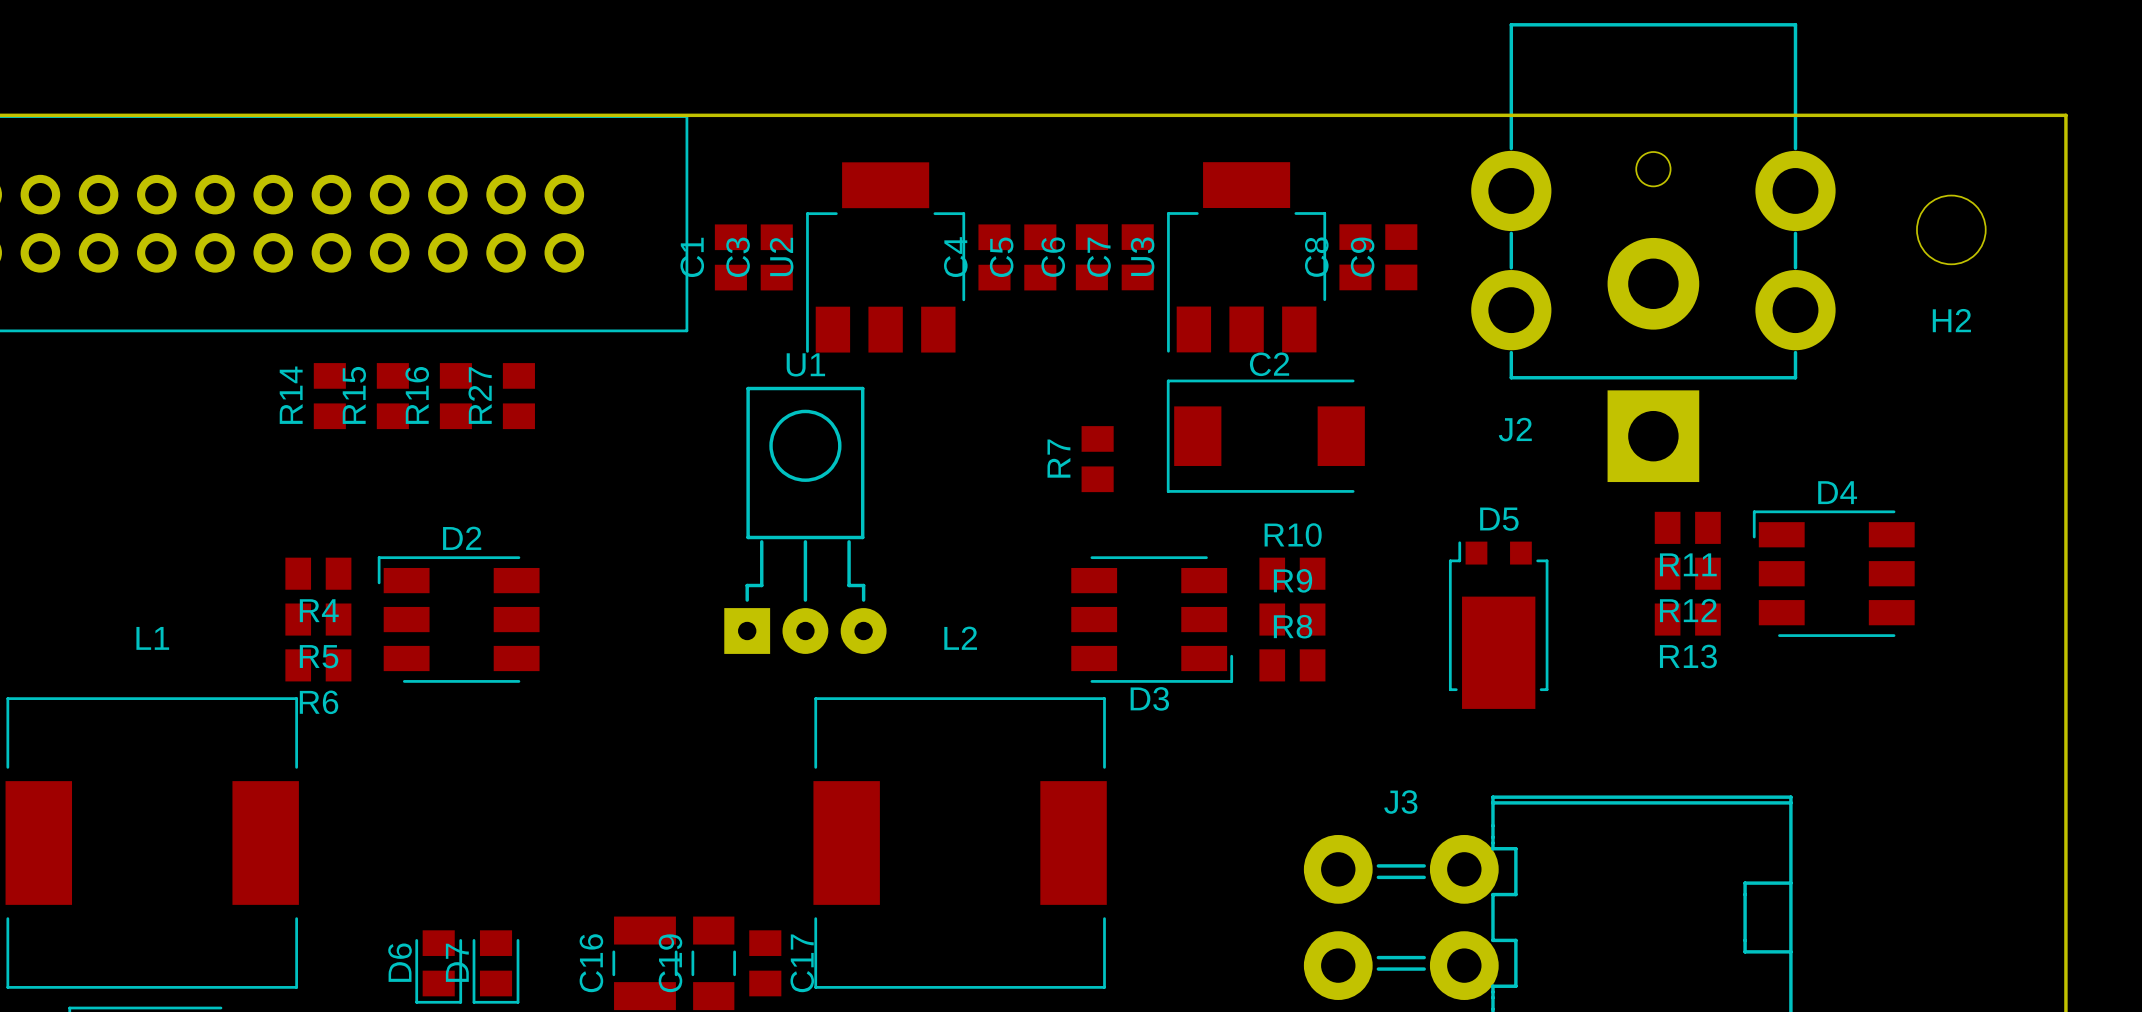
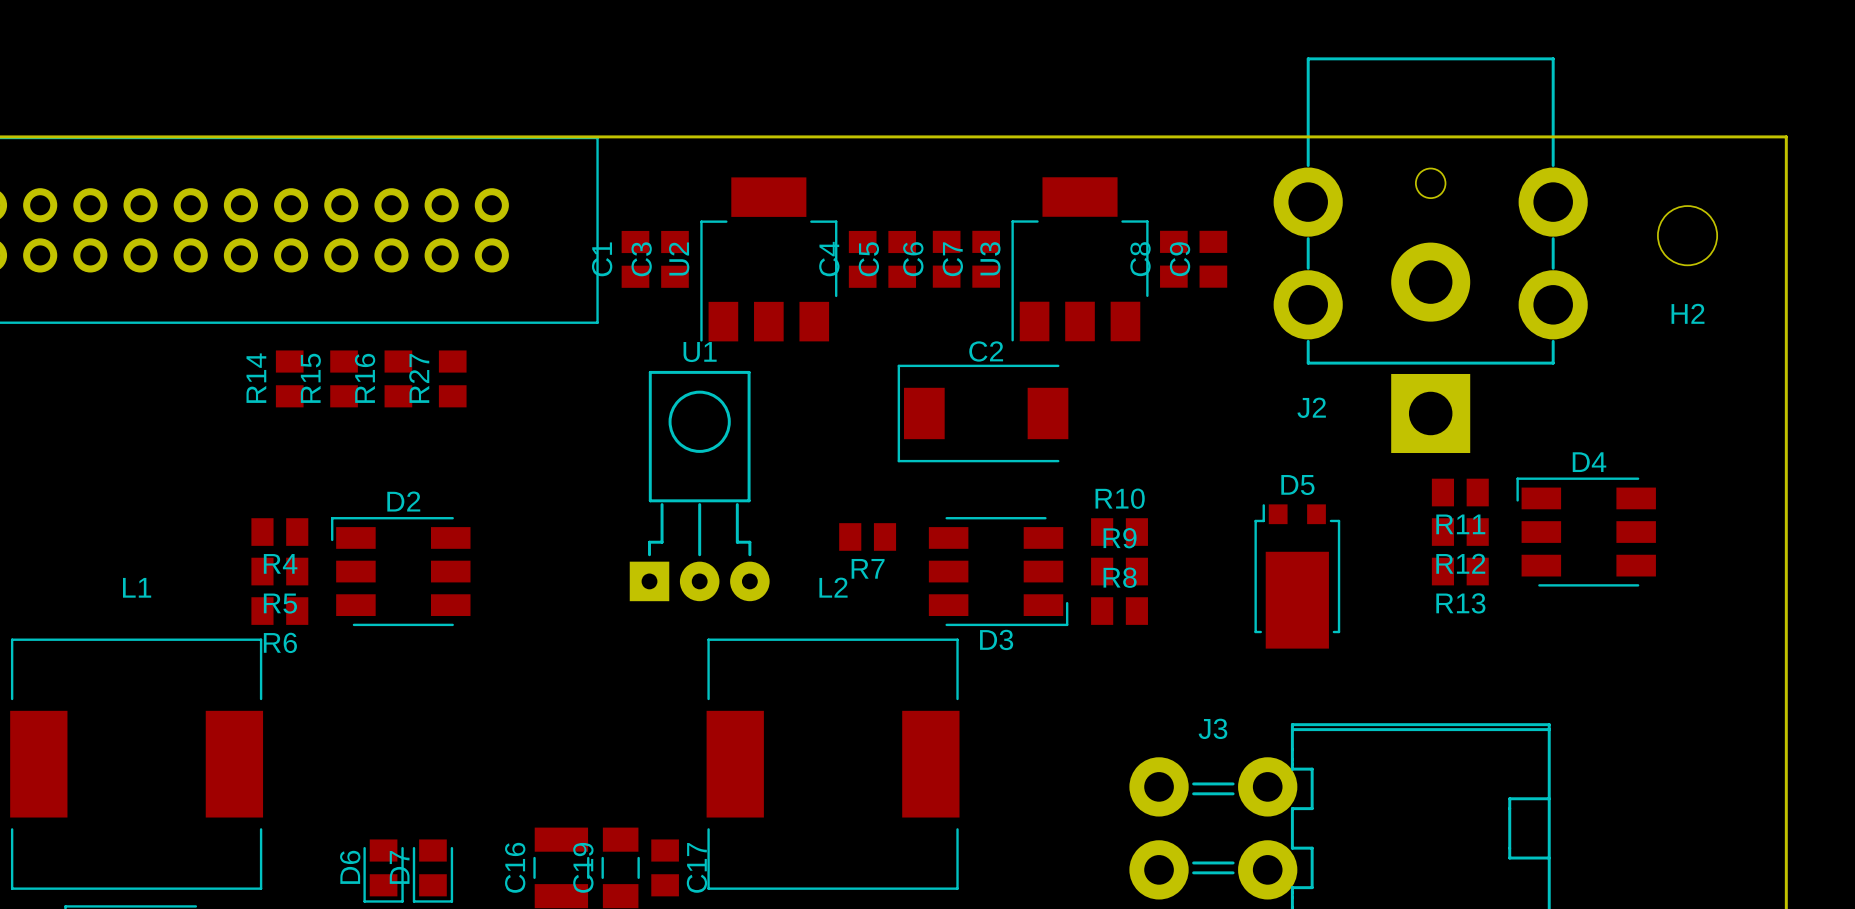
C2 position: (1265, 436) -> (983, 413)
R7 name position: R7 (1058, 458) -> R7 (868, 568)
R7 rotation: 0° (1097, 459) -> 90° clockwise (867, 536)
R7 position: (1097, 459) -> (867, 536)

